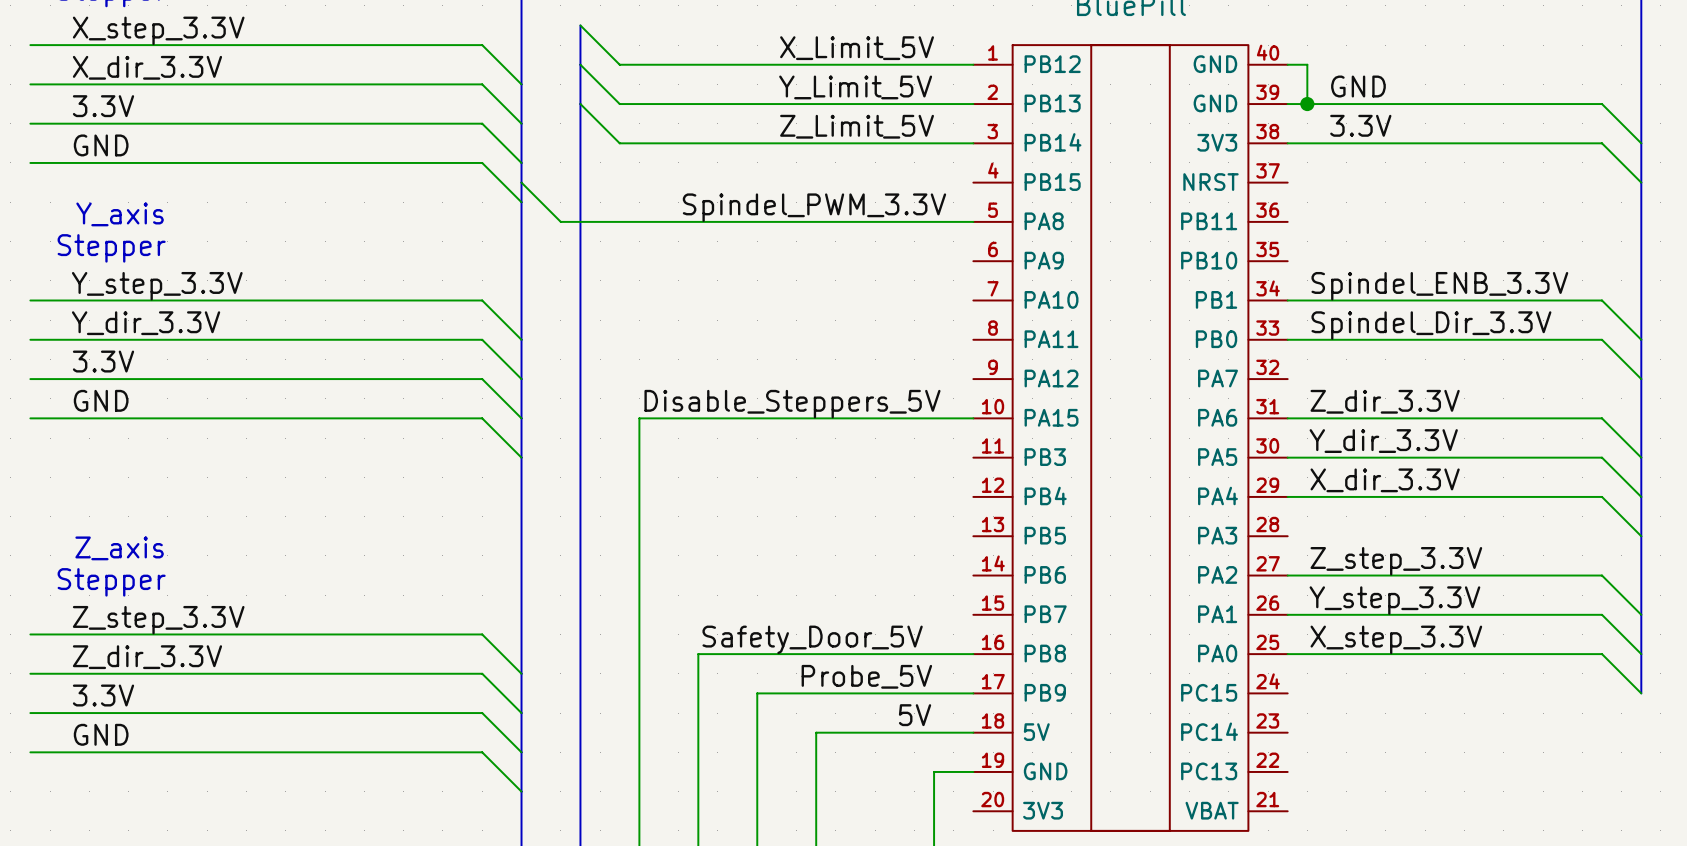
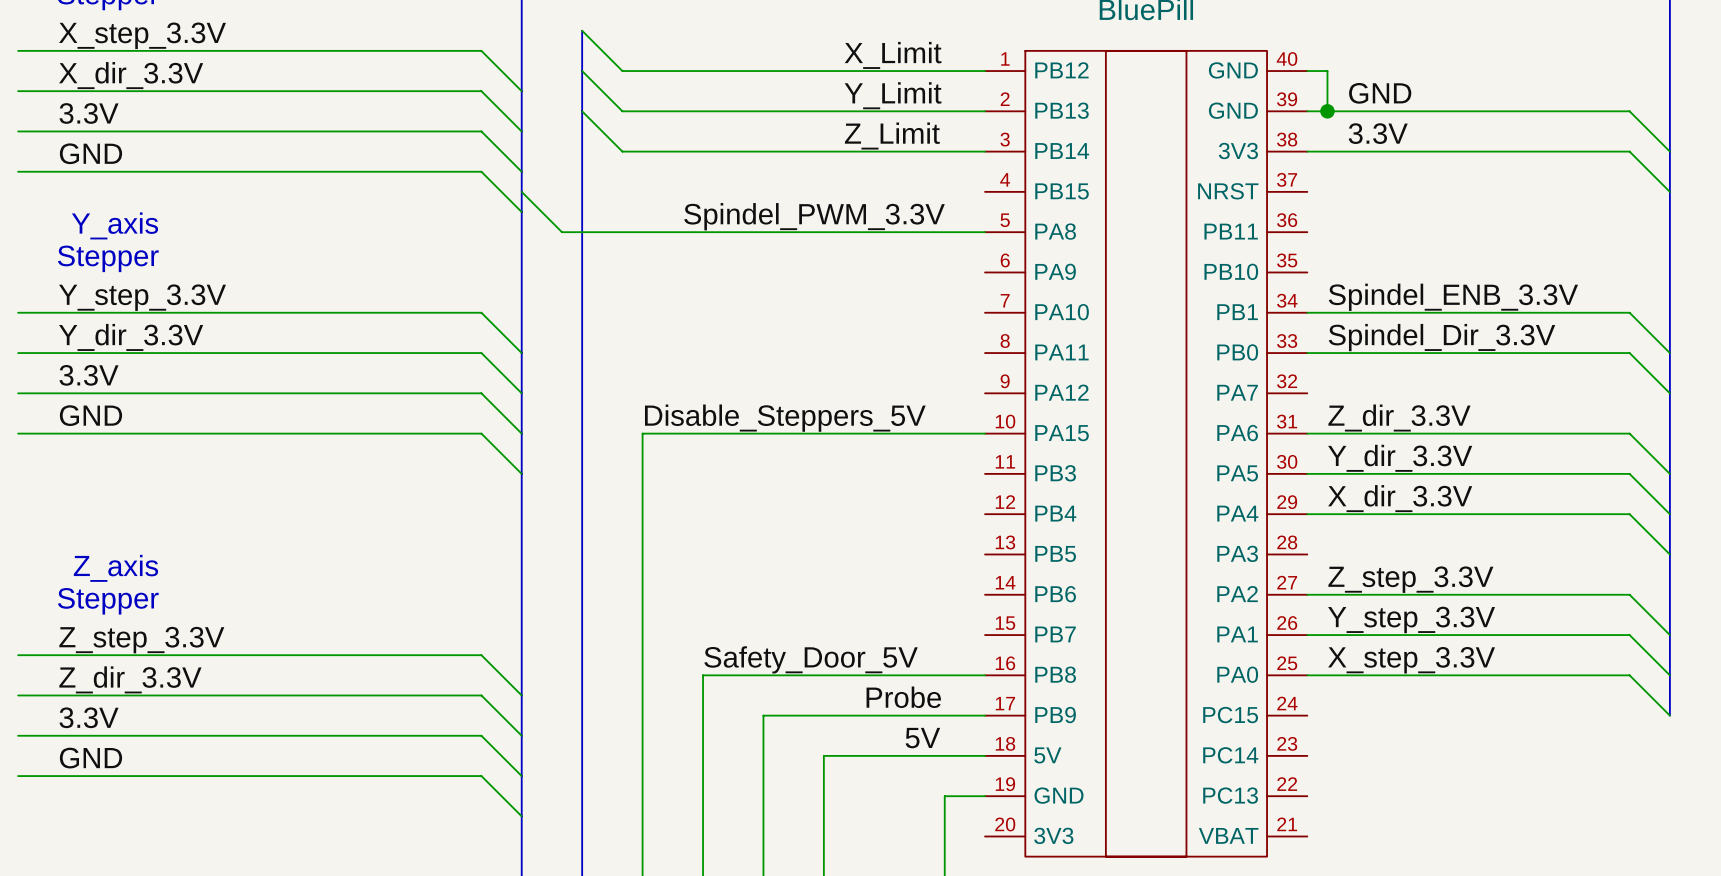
label: X_Limit_5V (857, 48) -> none
label: none -> X_Limit (893, 55)
label: Y_Limit_5V (855, 87) -> none
label: none -> Y_Limit (893, 95)
label: Z_Limit_5V (857, 126) -> none
label: none -> Z_Limit (892, 136)
label: Probe_5V (866, 676) -> Probe (903, 697)

